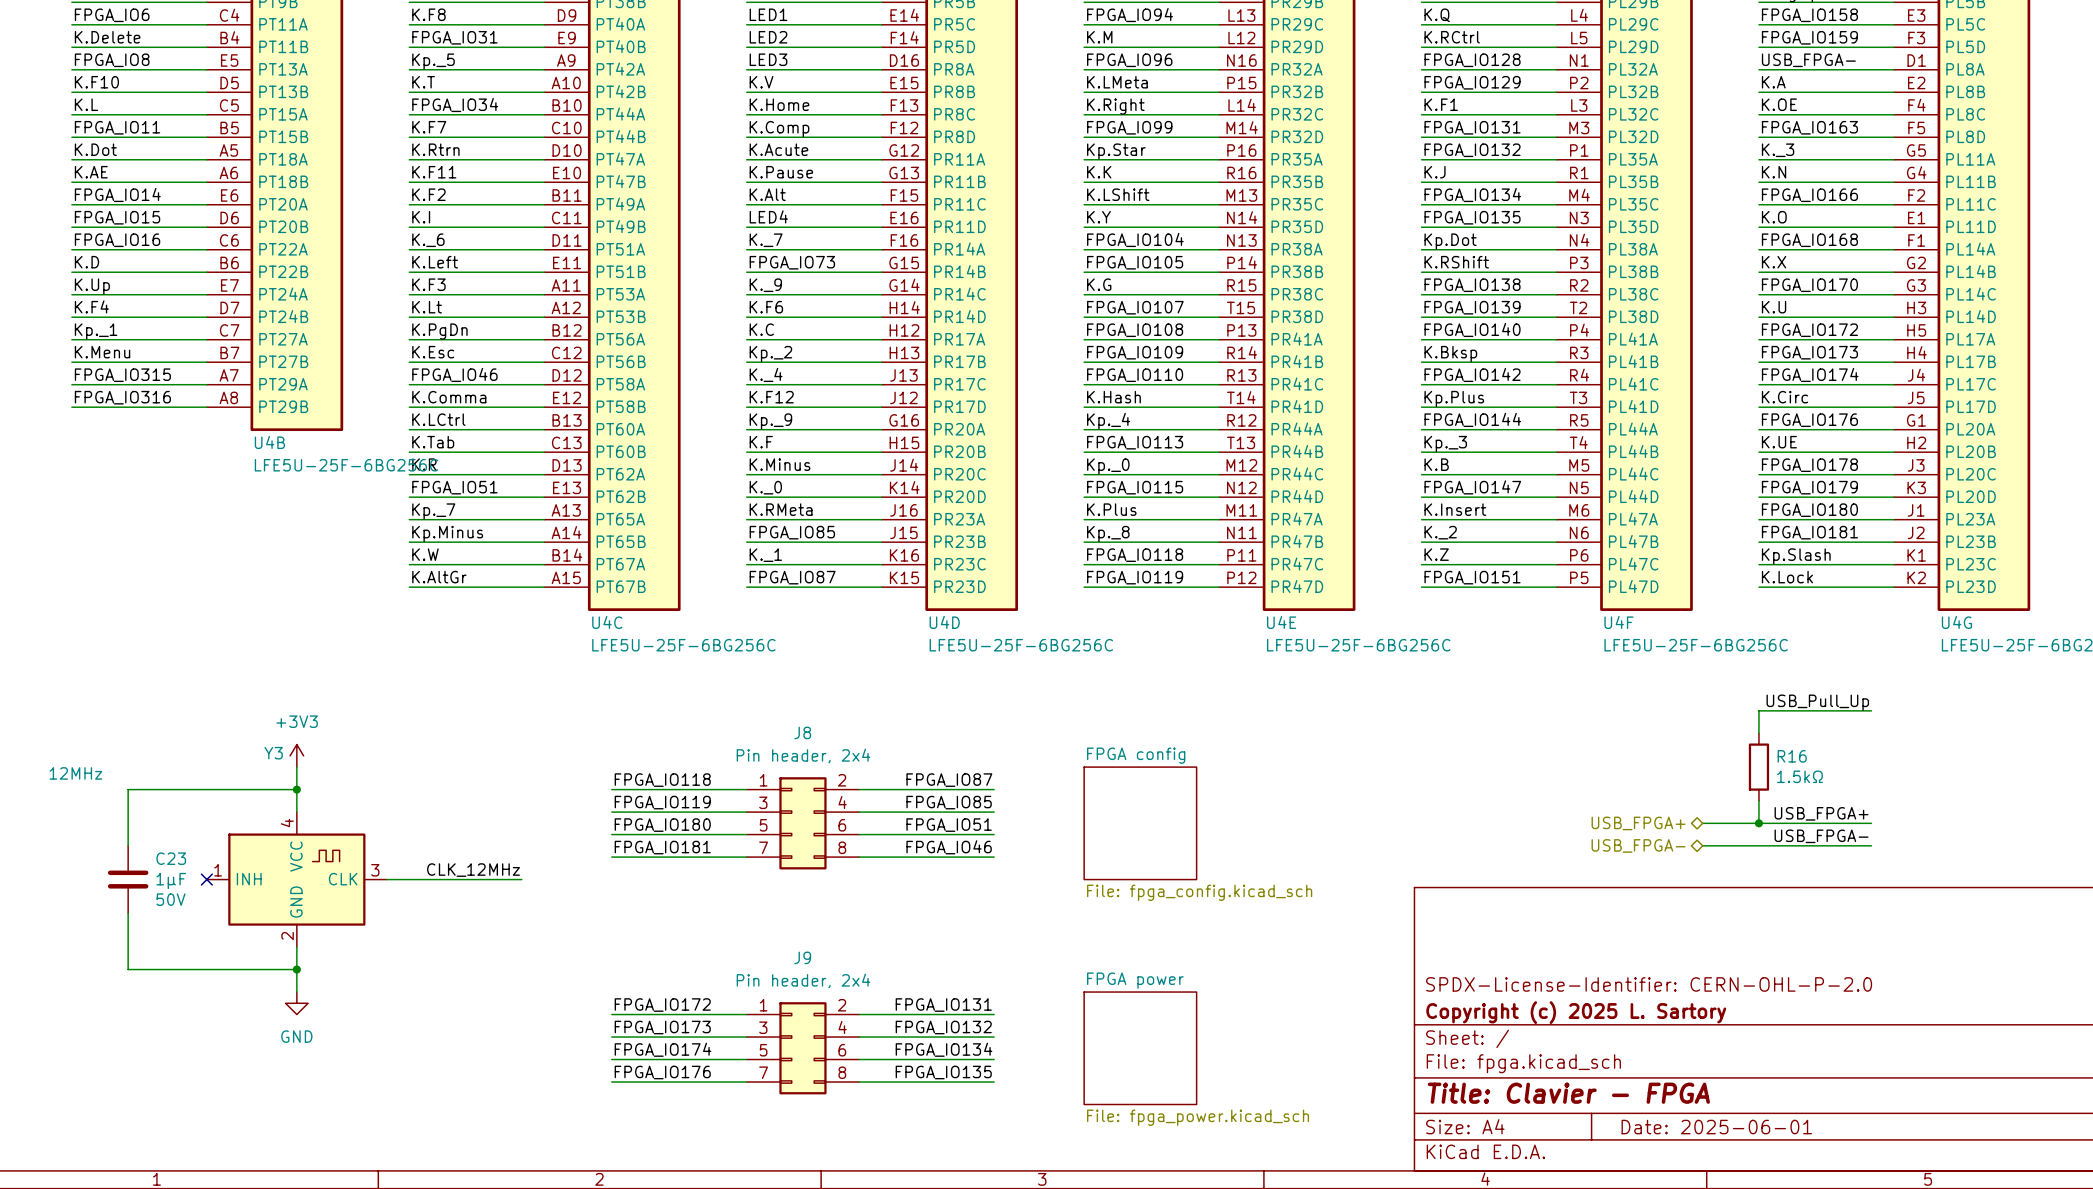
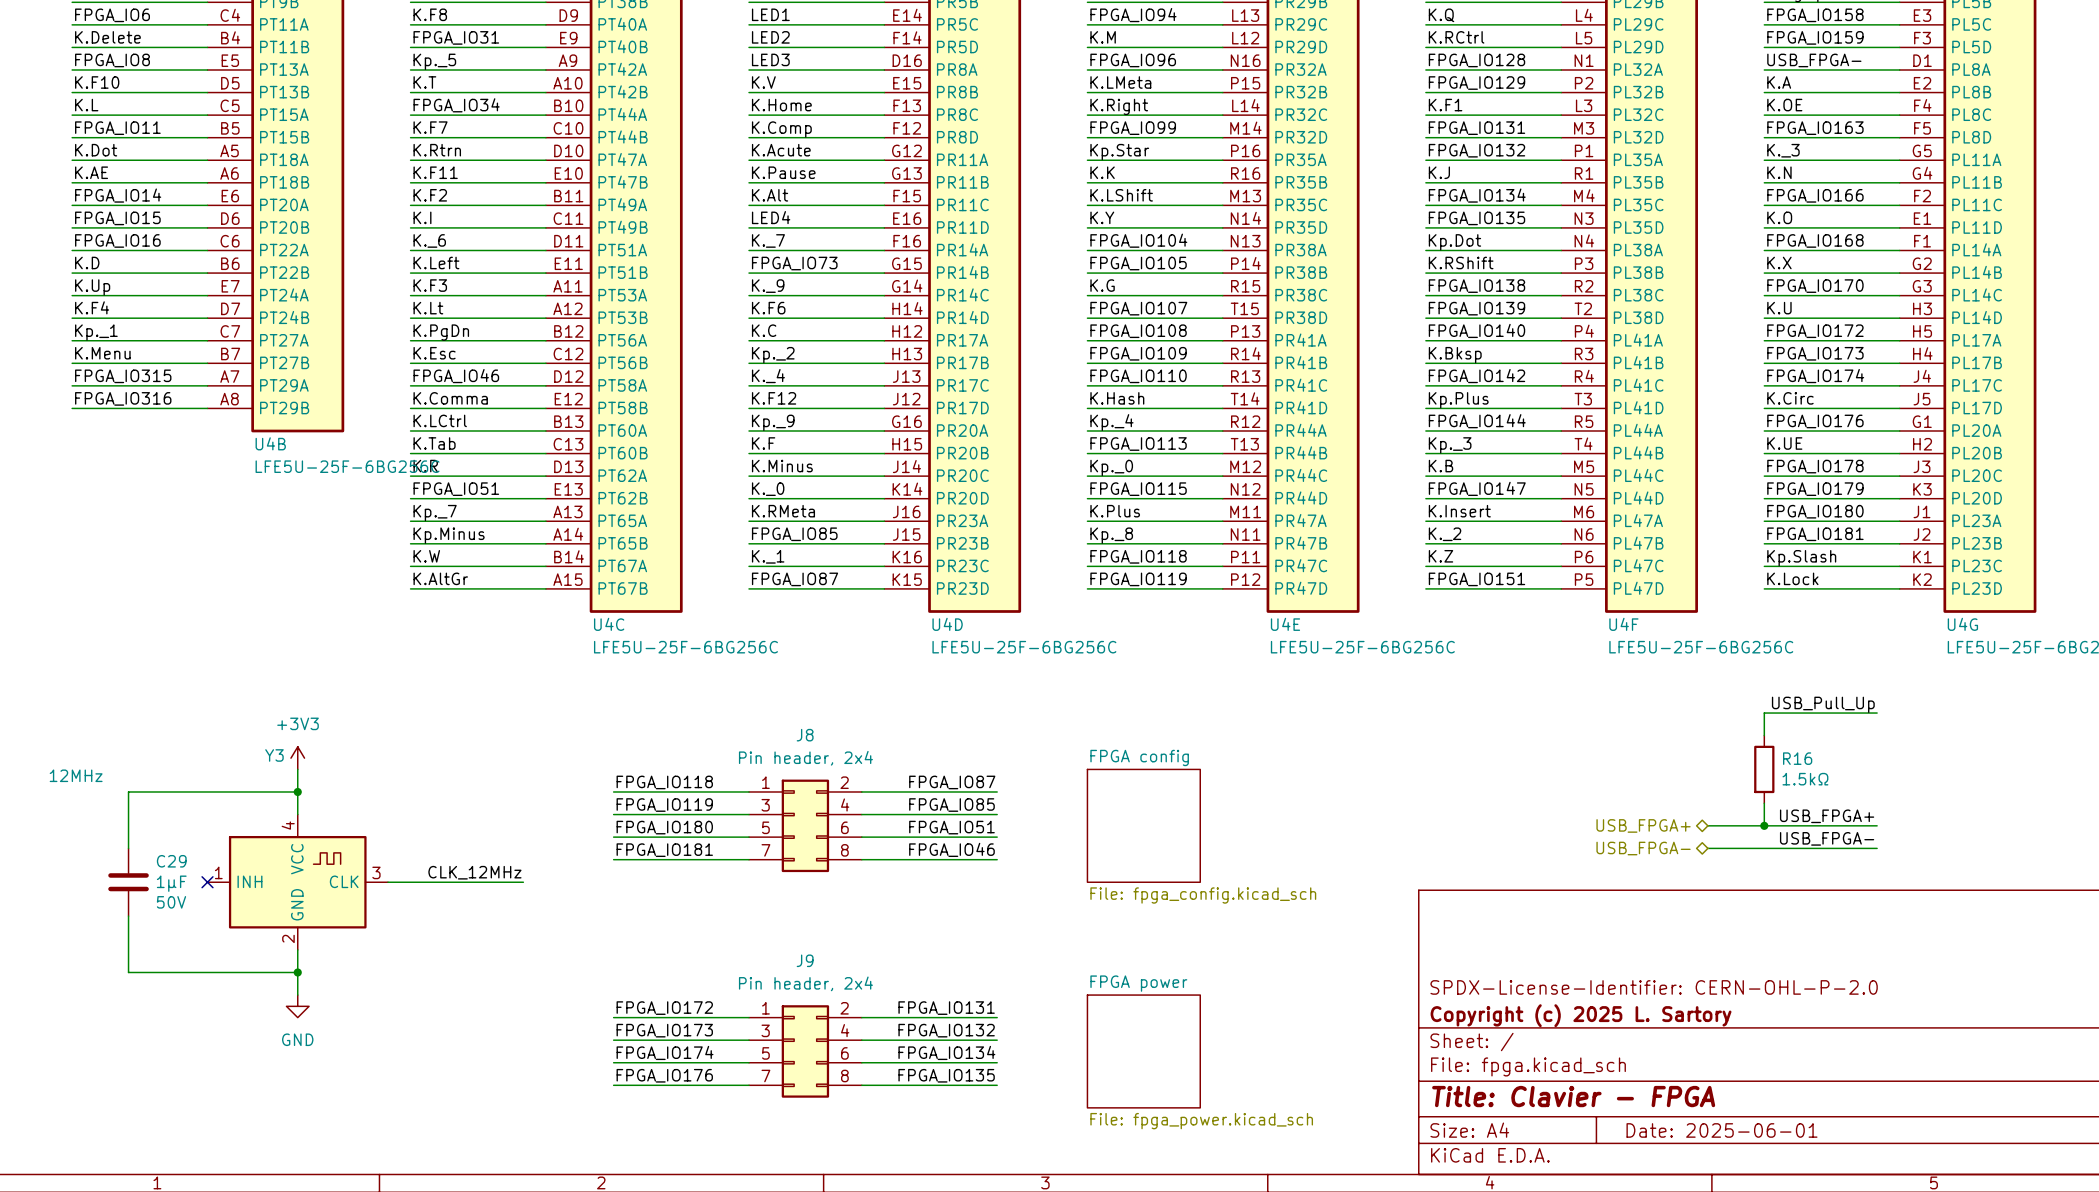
C23 name: C23 (171, 858) -> C29 (171, 861)

